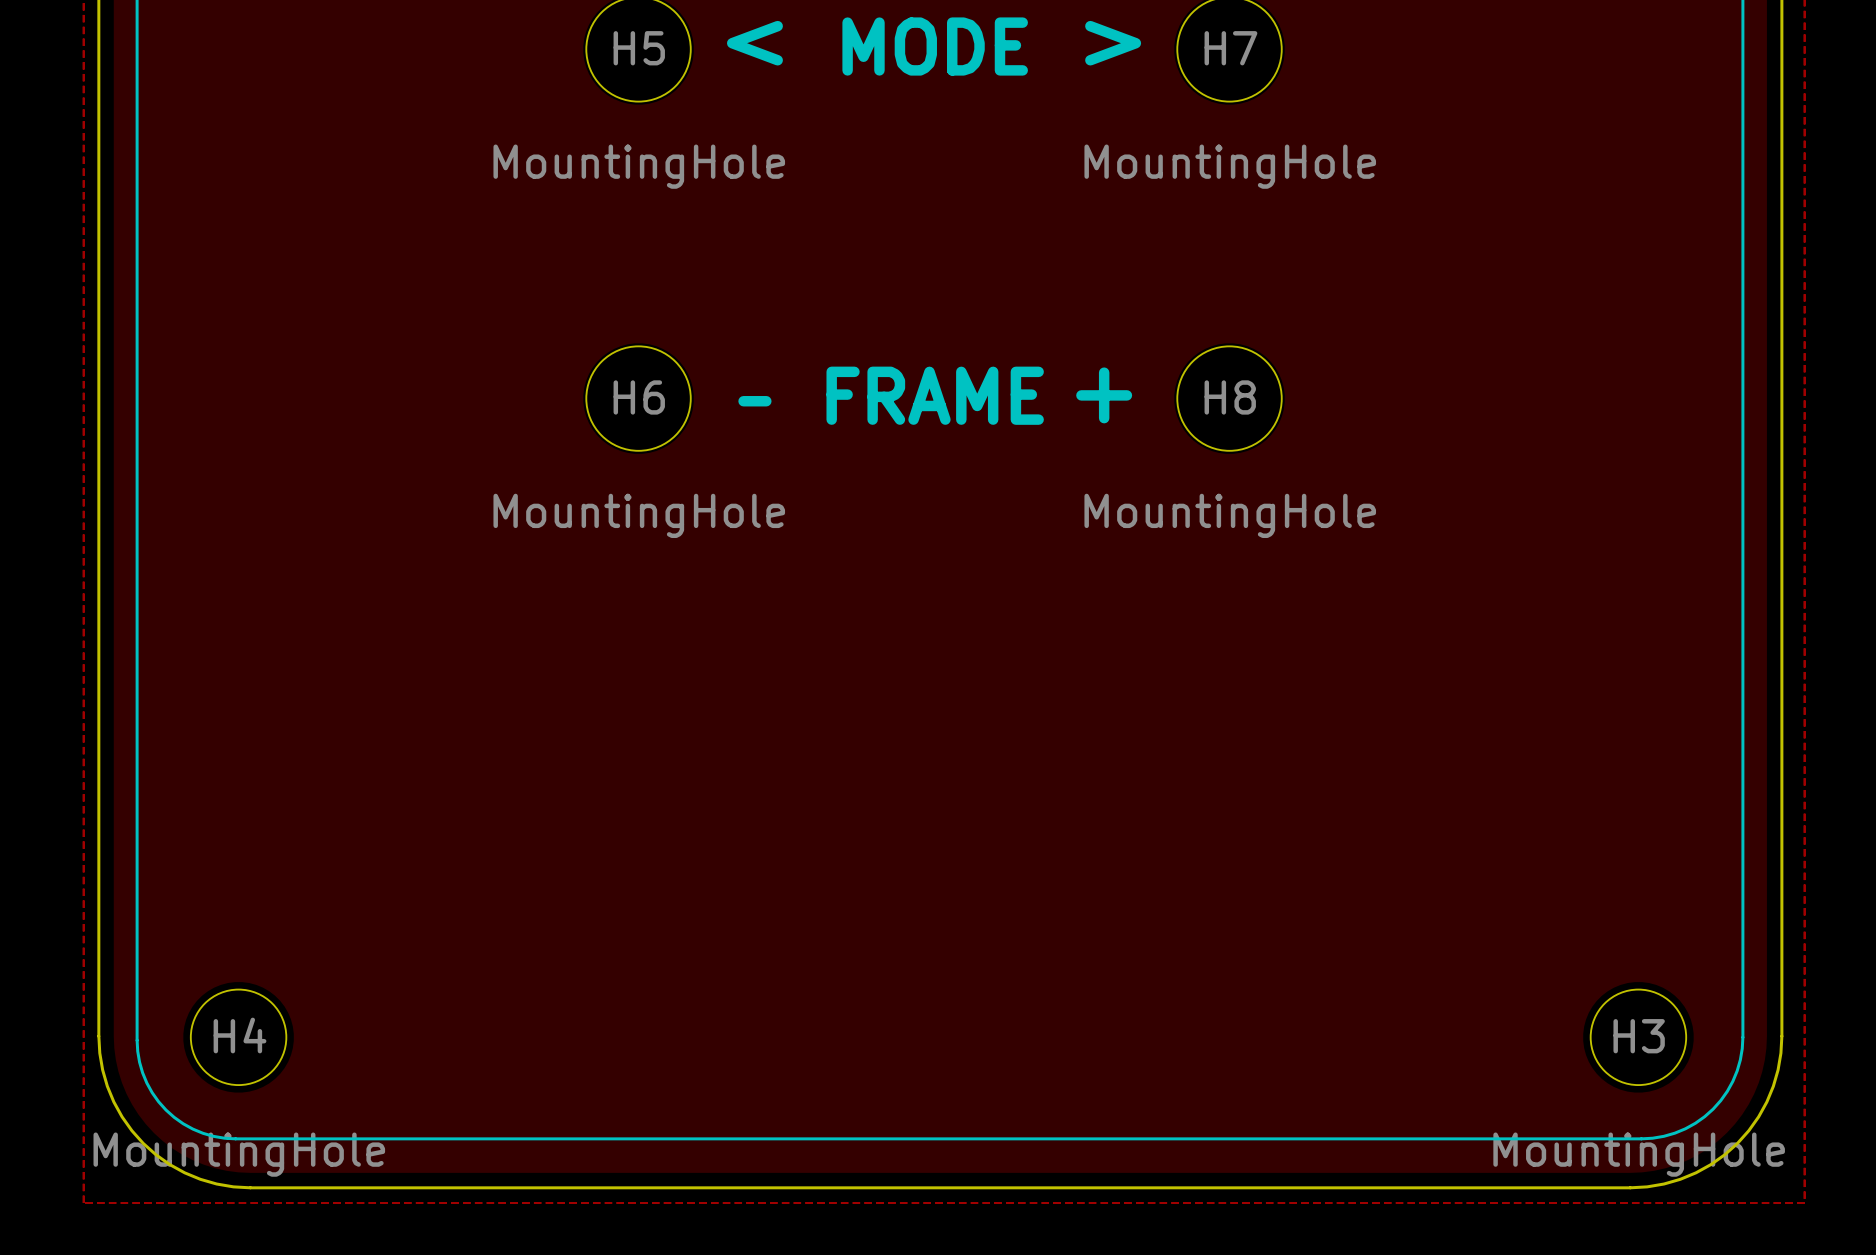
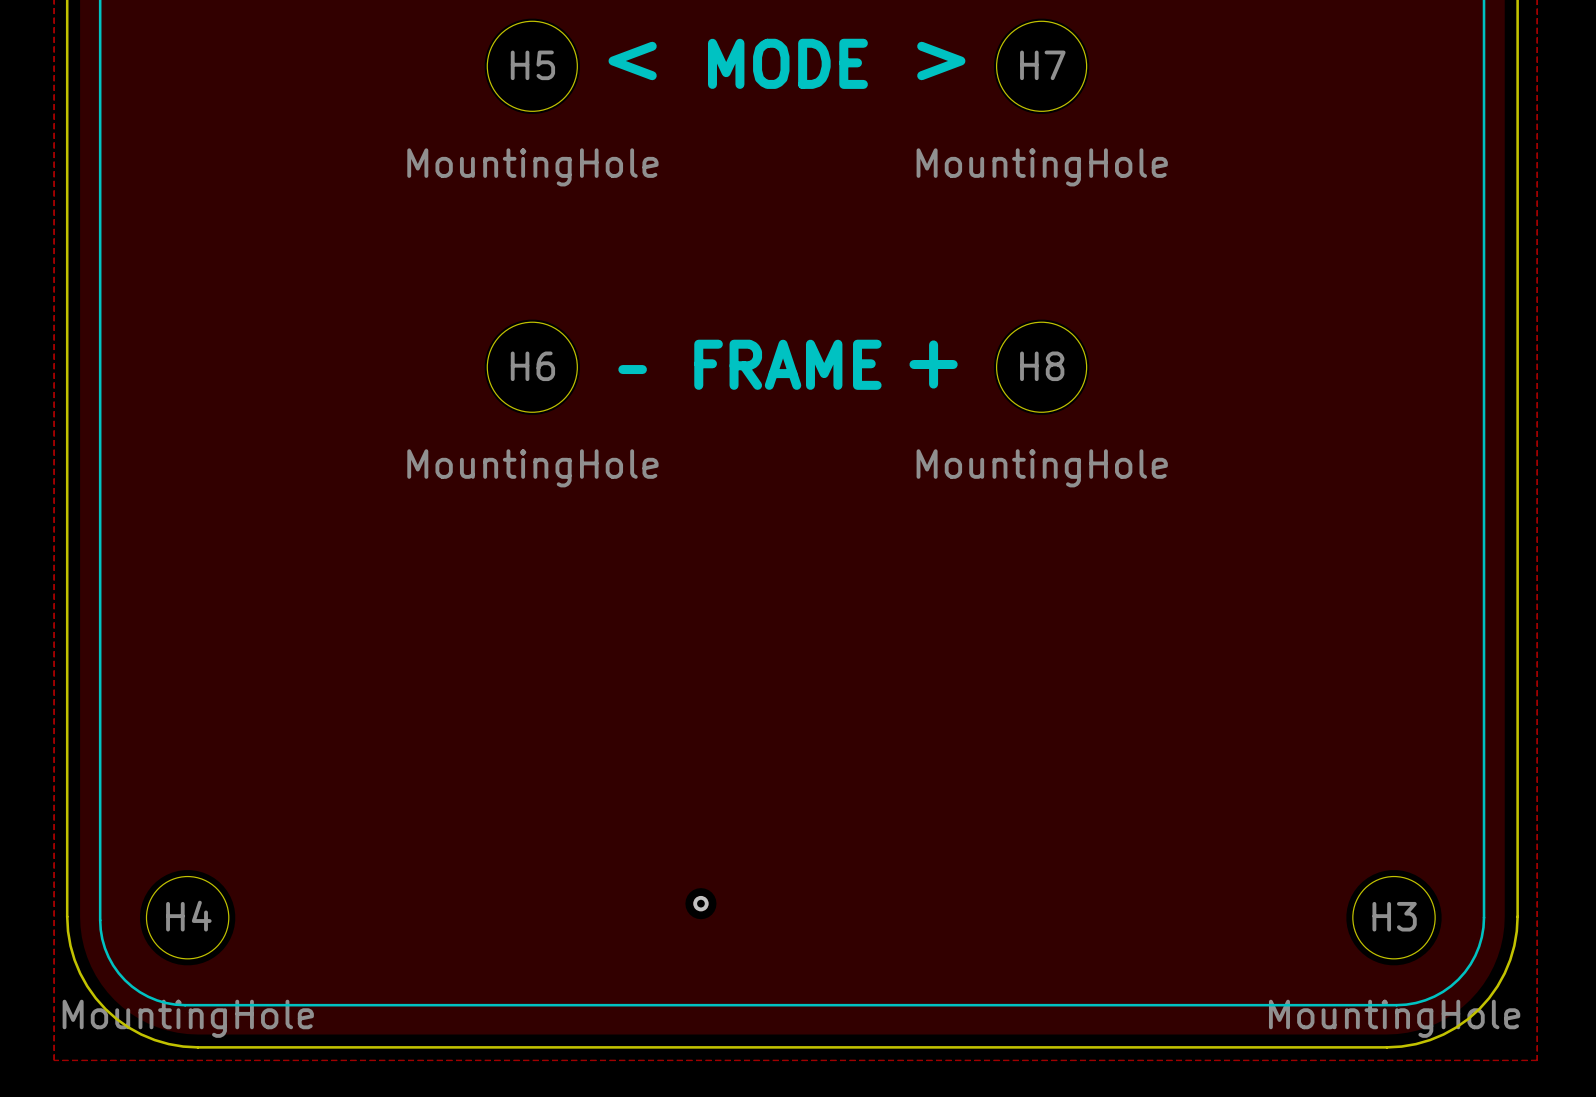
via: none -> (700, 903)

